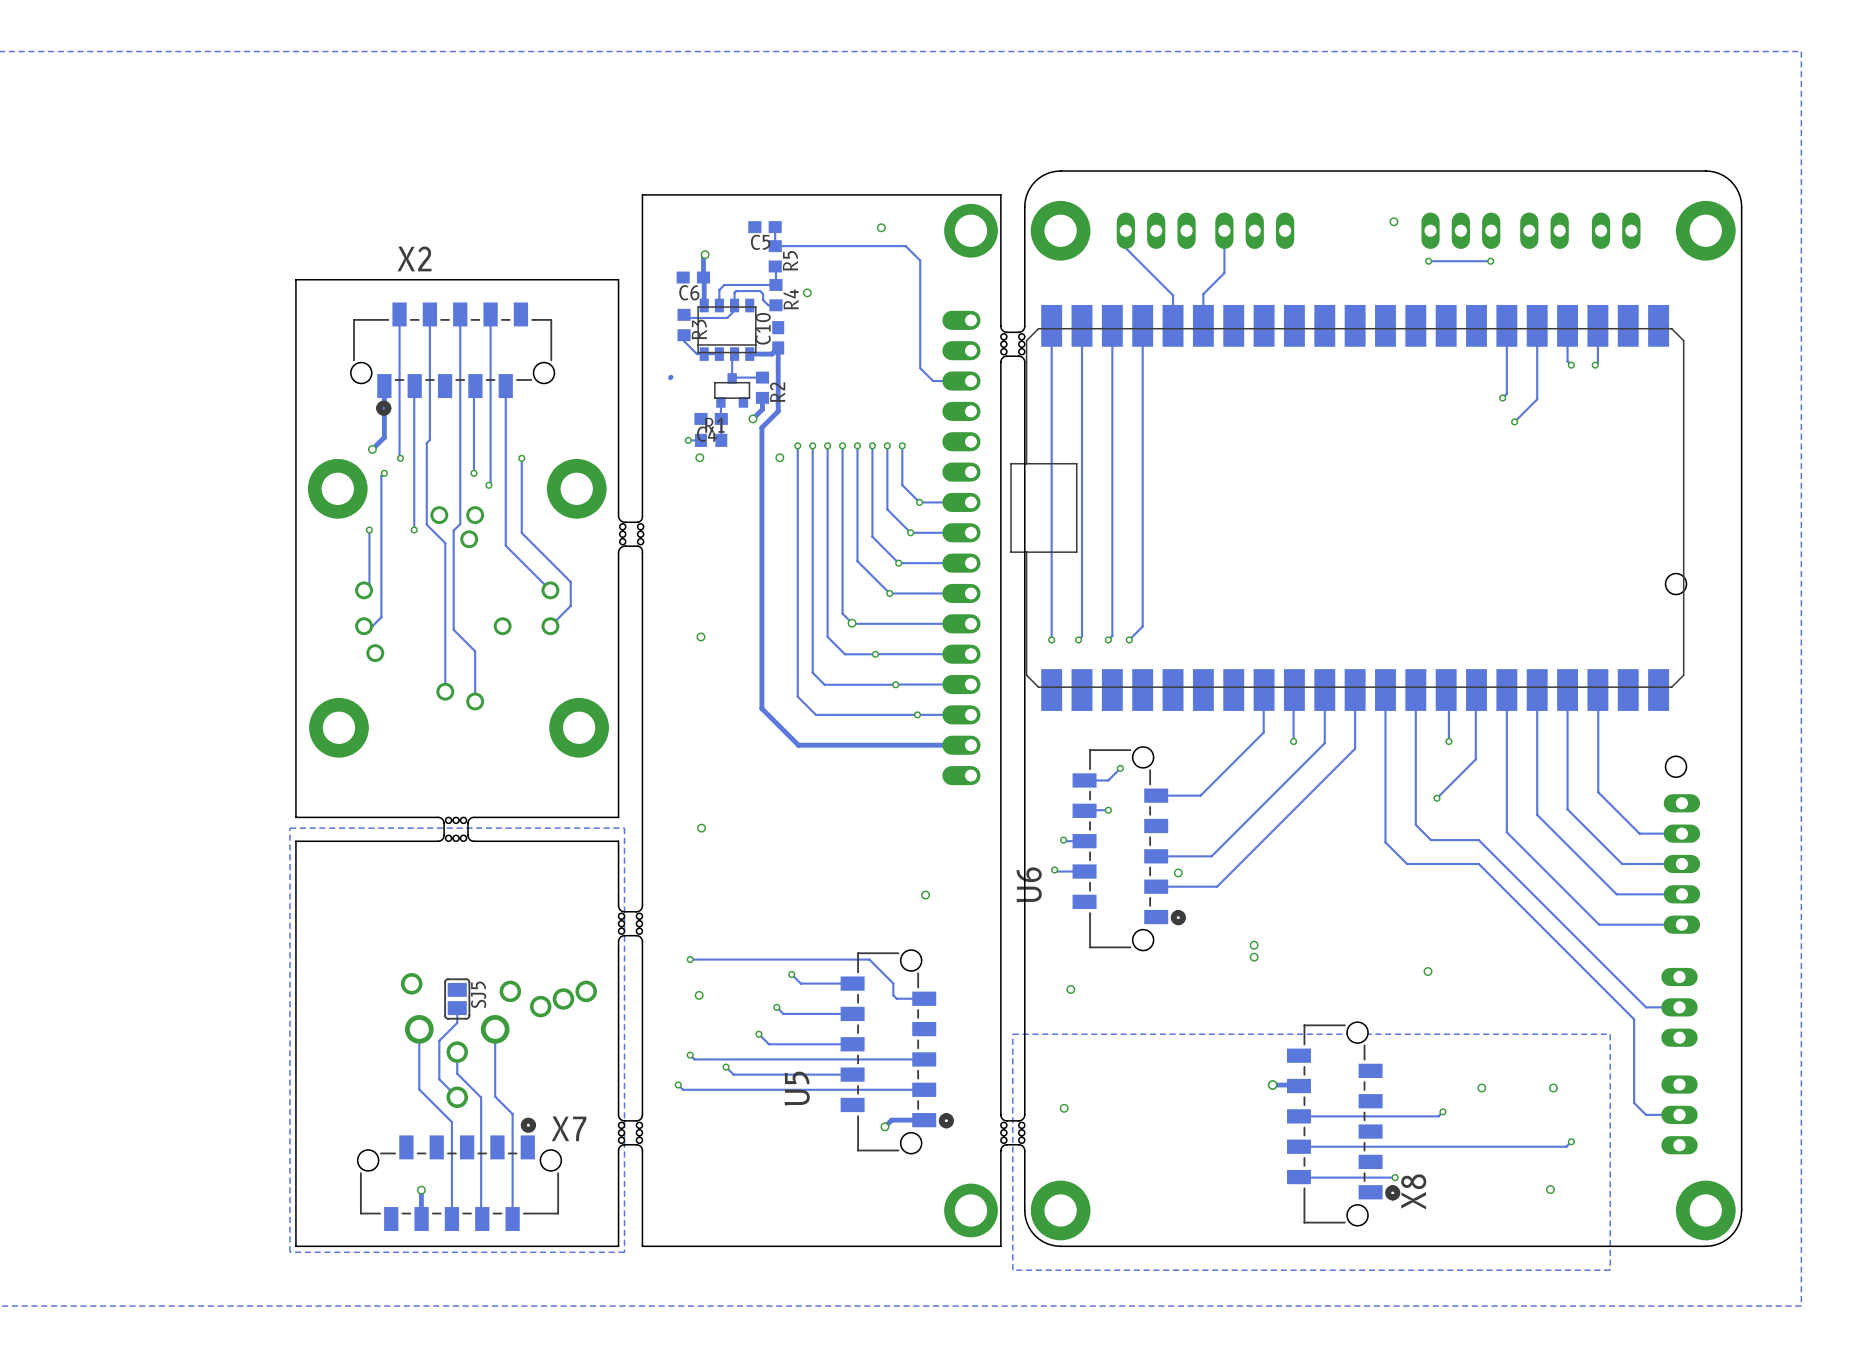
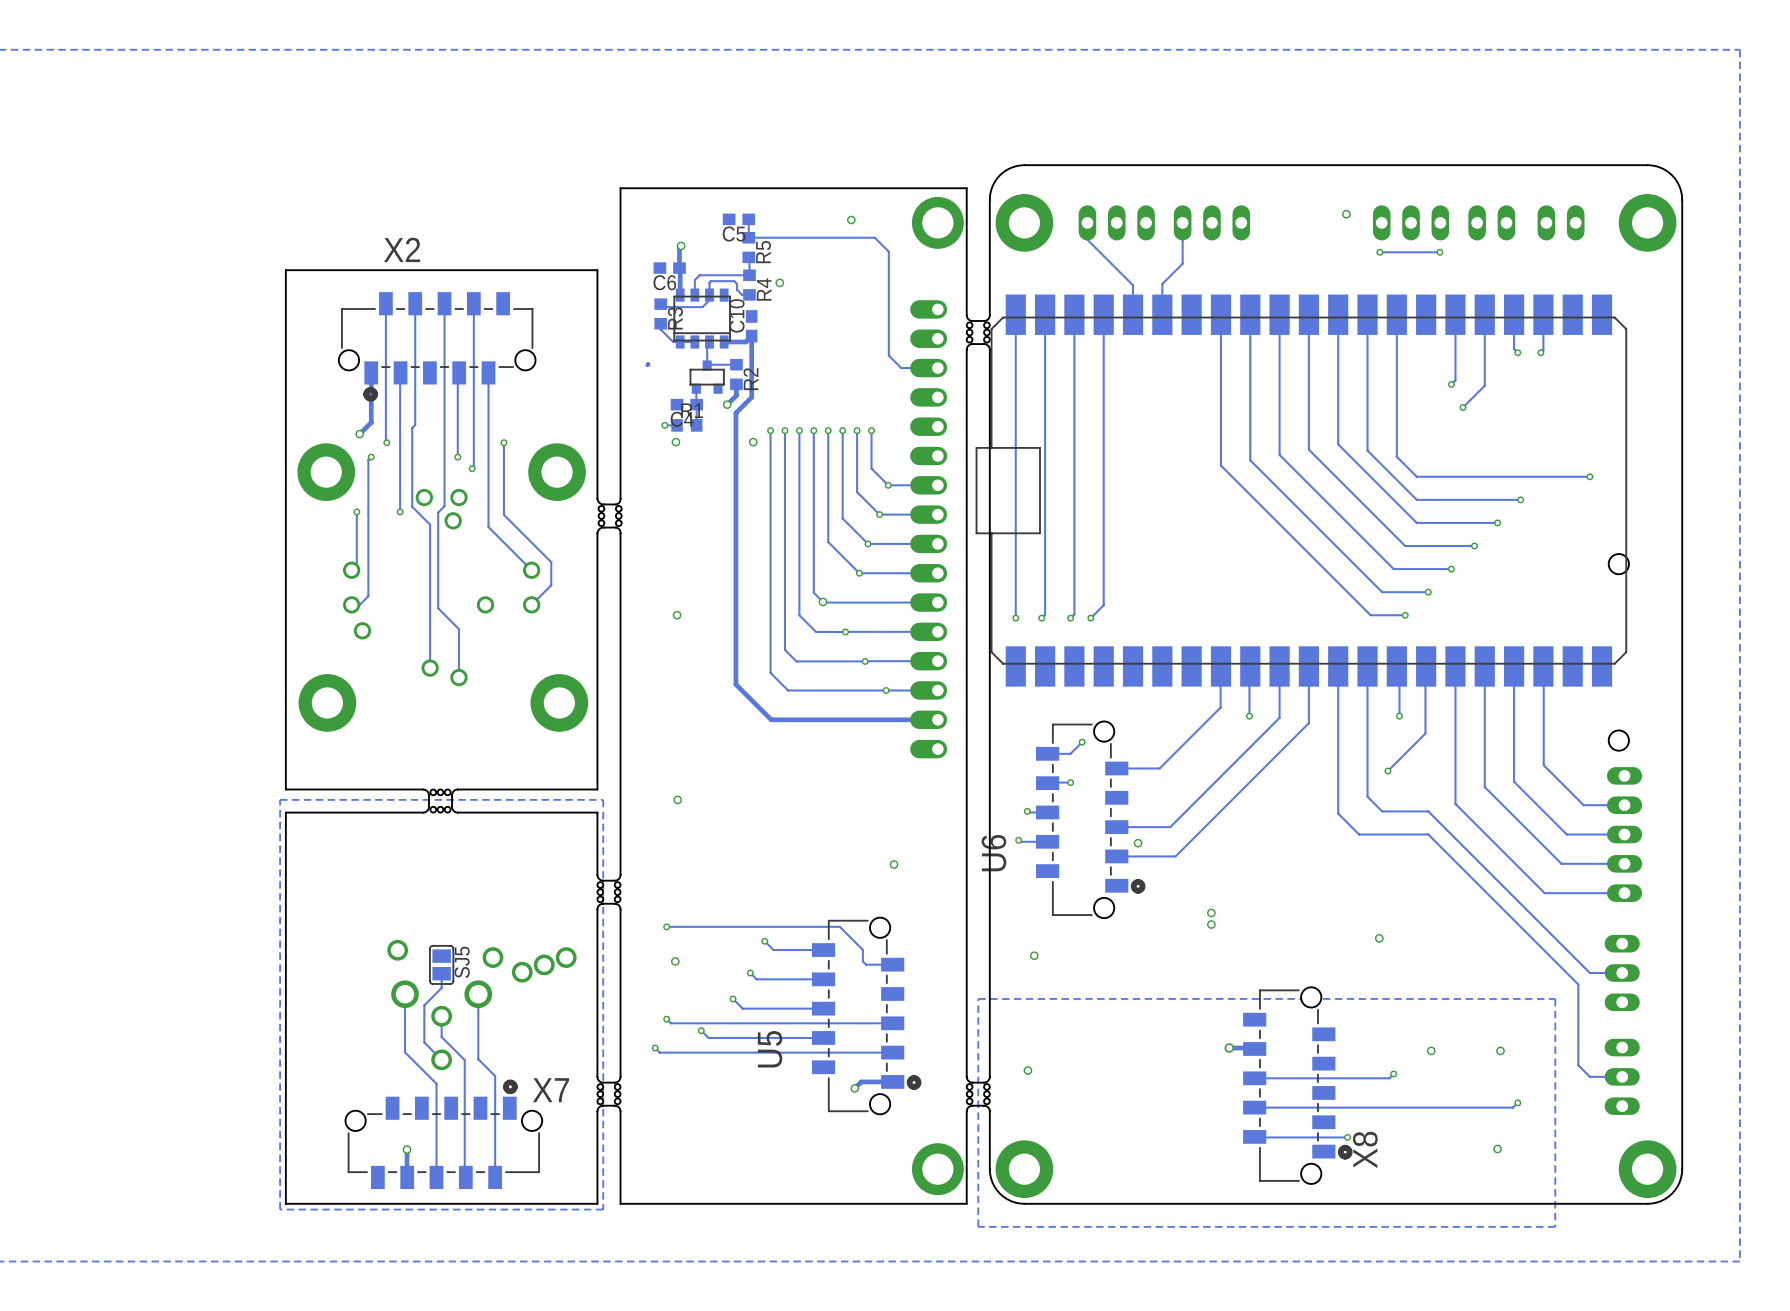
track: none -> (1220, 314) (1220, 465) (1370, 615) (1405, 615)
track: none -> (1250, 314) (1250, 460) (1382, 592) (1428, 592)
track: none -> (1279, 314) (1279, 454) (1393, 569) (1451, 569)
track: none -> (1308, 314) (1308, 449) (1405, 546) (1474, 546)
track: none -> (1338, 314) (1338, 444) (1416, 522) (1497, 522)
track: none -> (1367, 314) (1367, 450) (1416, 499) (1520, 499)
track: none -> (1396, 314) (1396, 456) (1416, 476) (1589, 476)
via: none -> (1589, 476)
via: none -> (1520, 499)
via: none -> (1497, 522)
via: none -> (1474, 546)
via: none -> (1451, 569)
via: none -> (1428, 592)
via: none -> (1405, 615)

